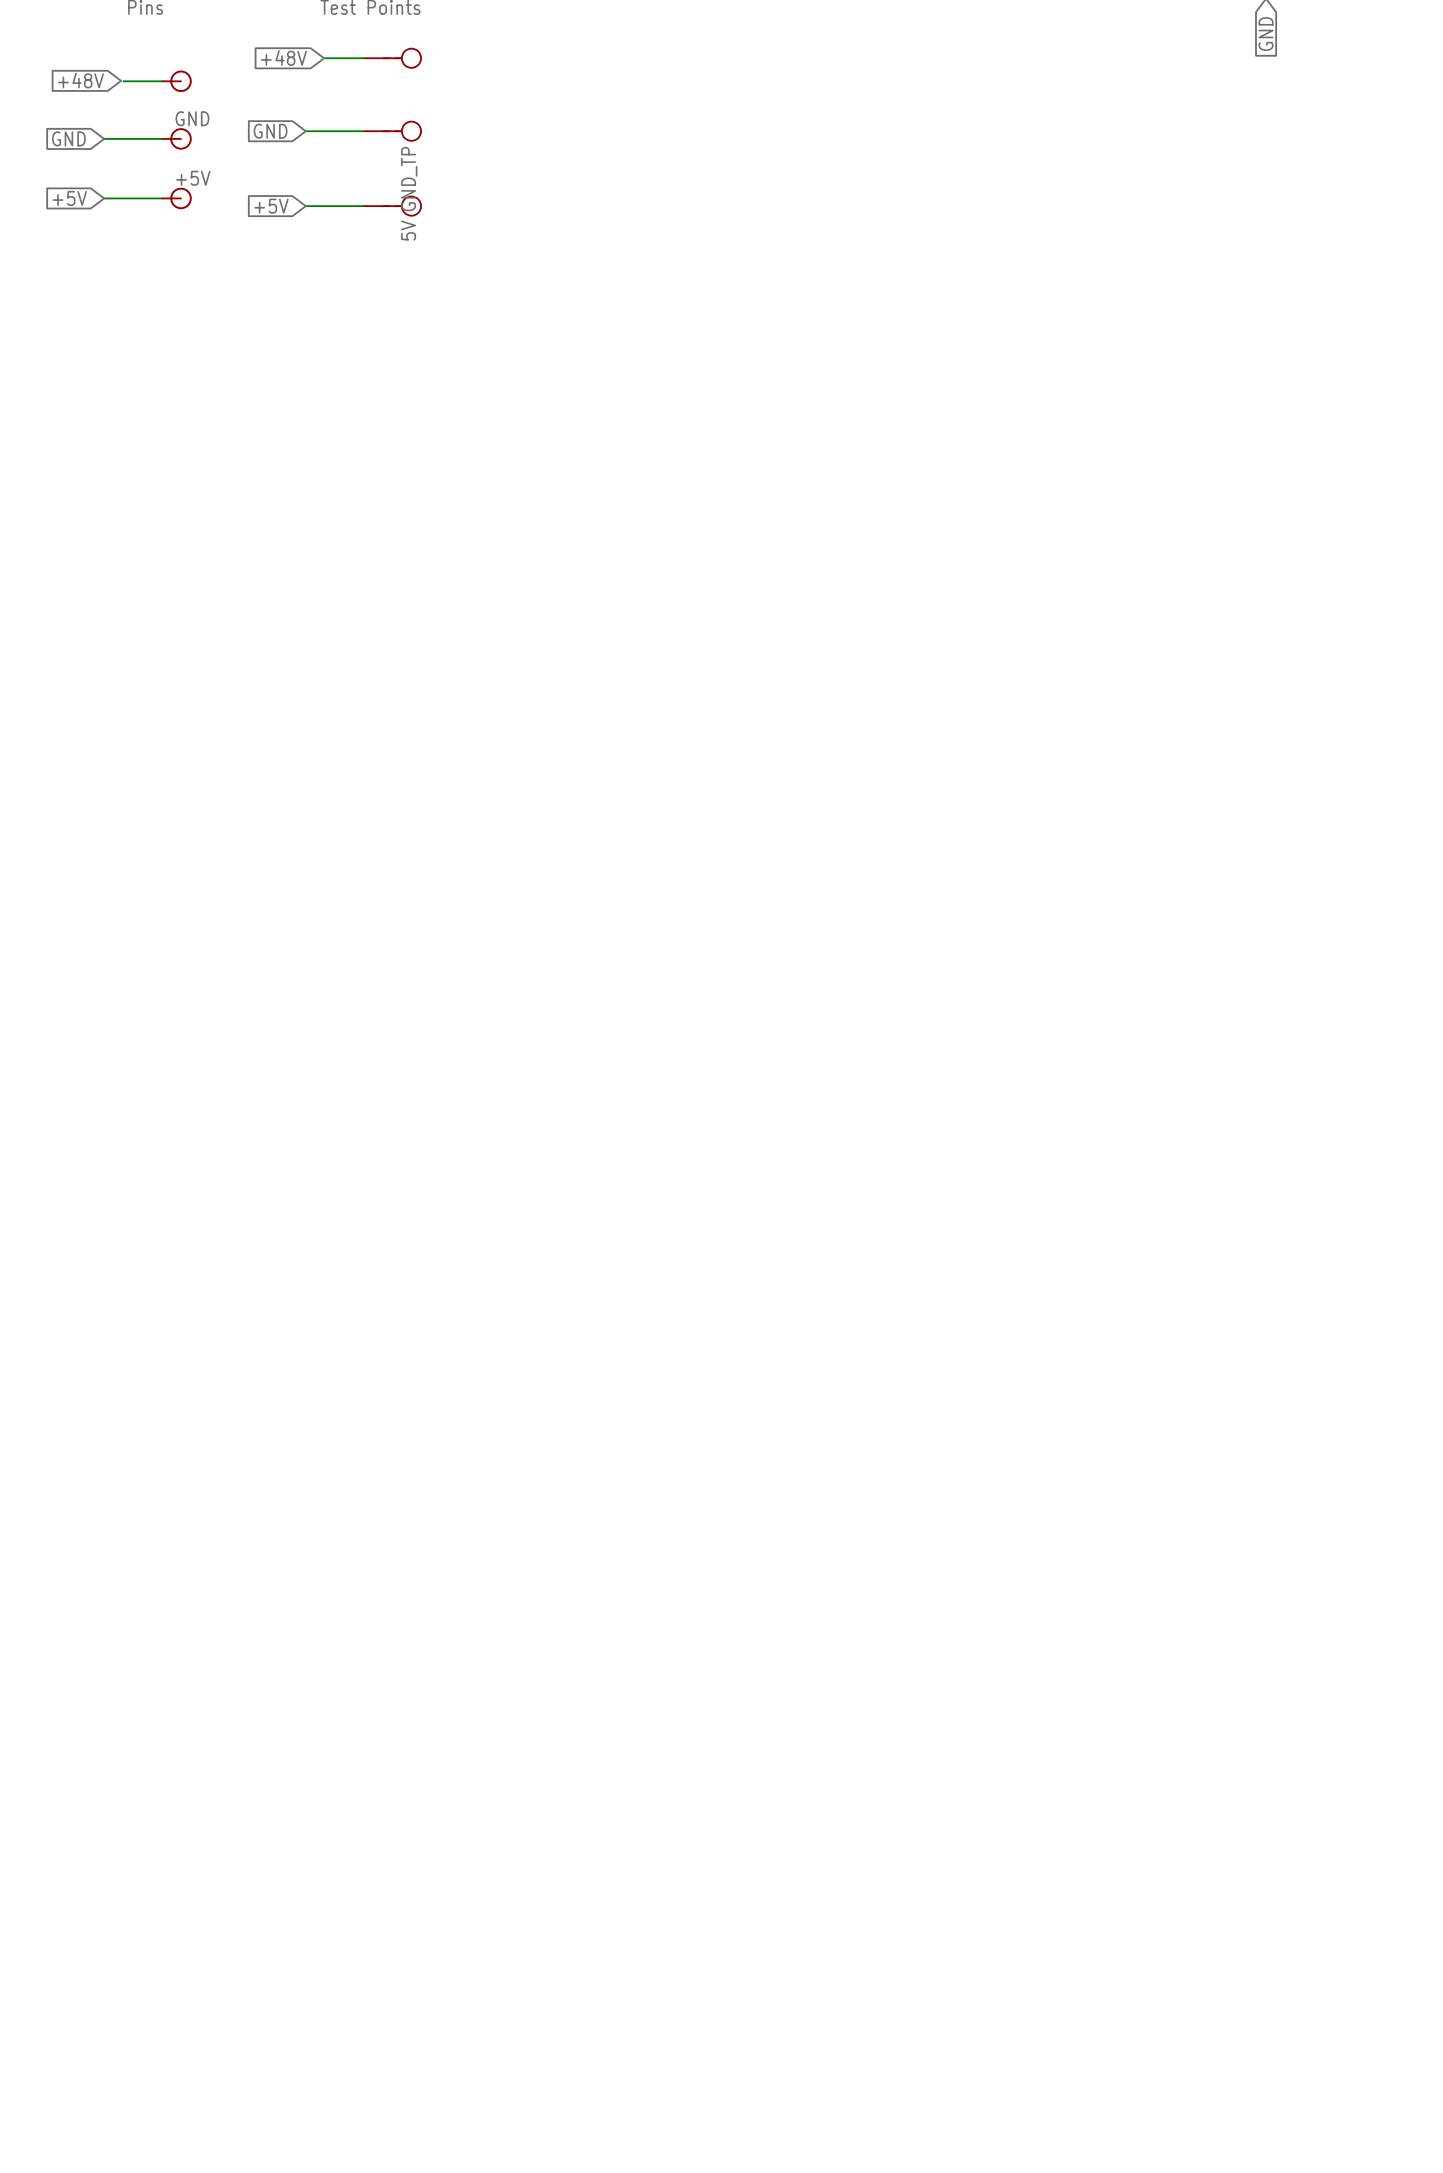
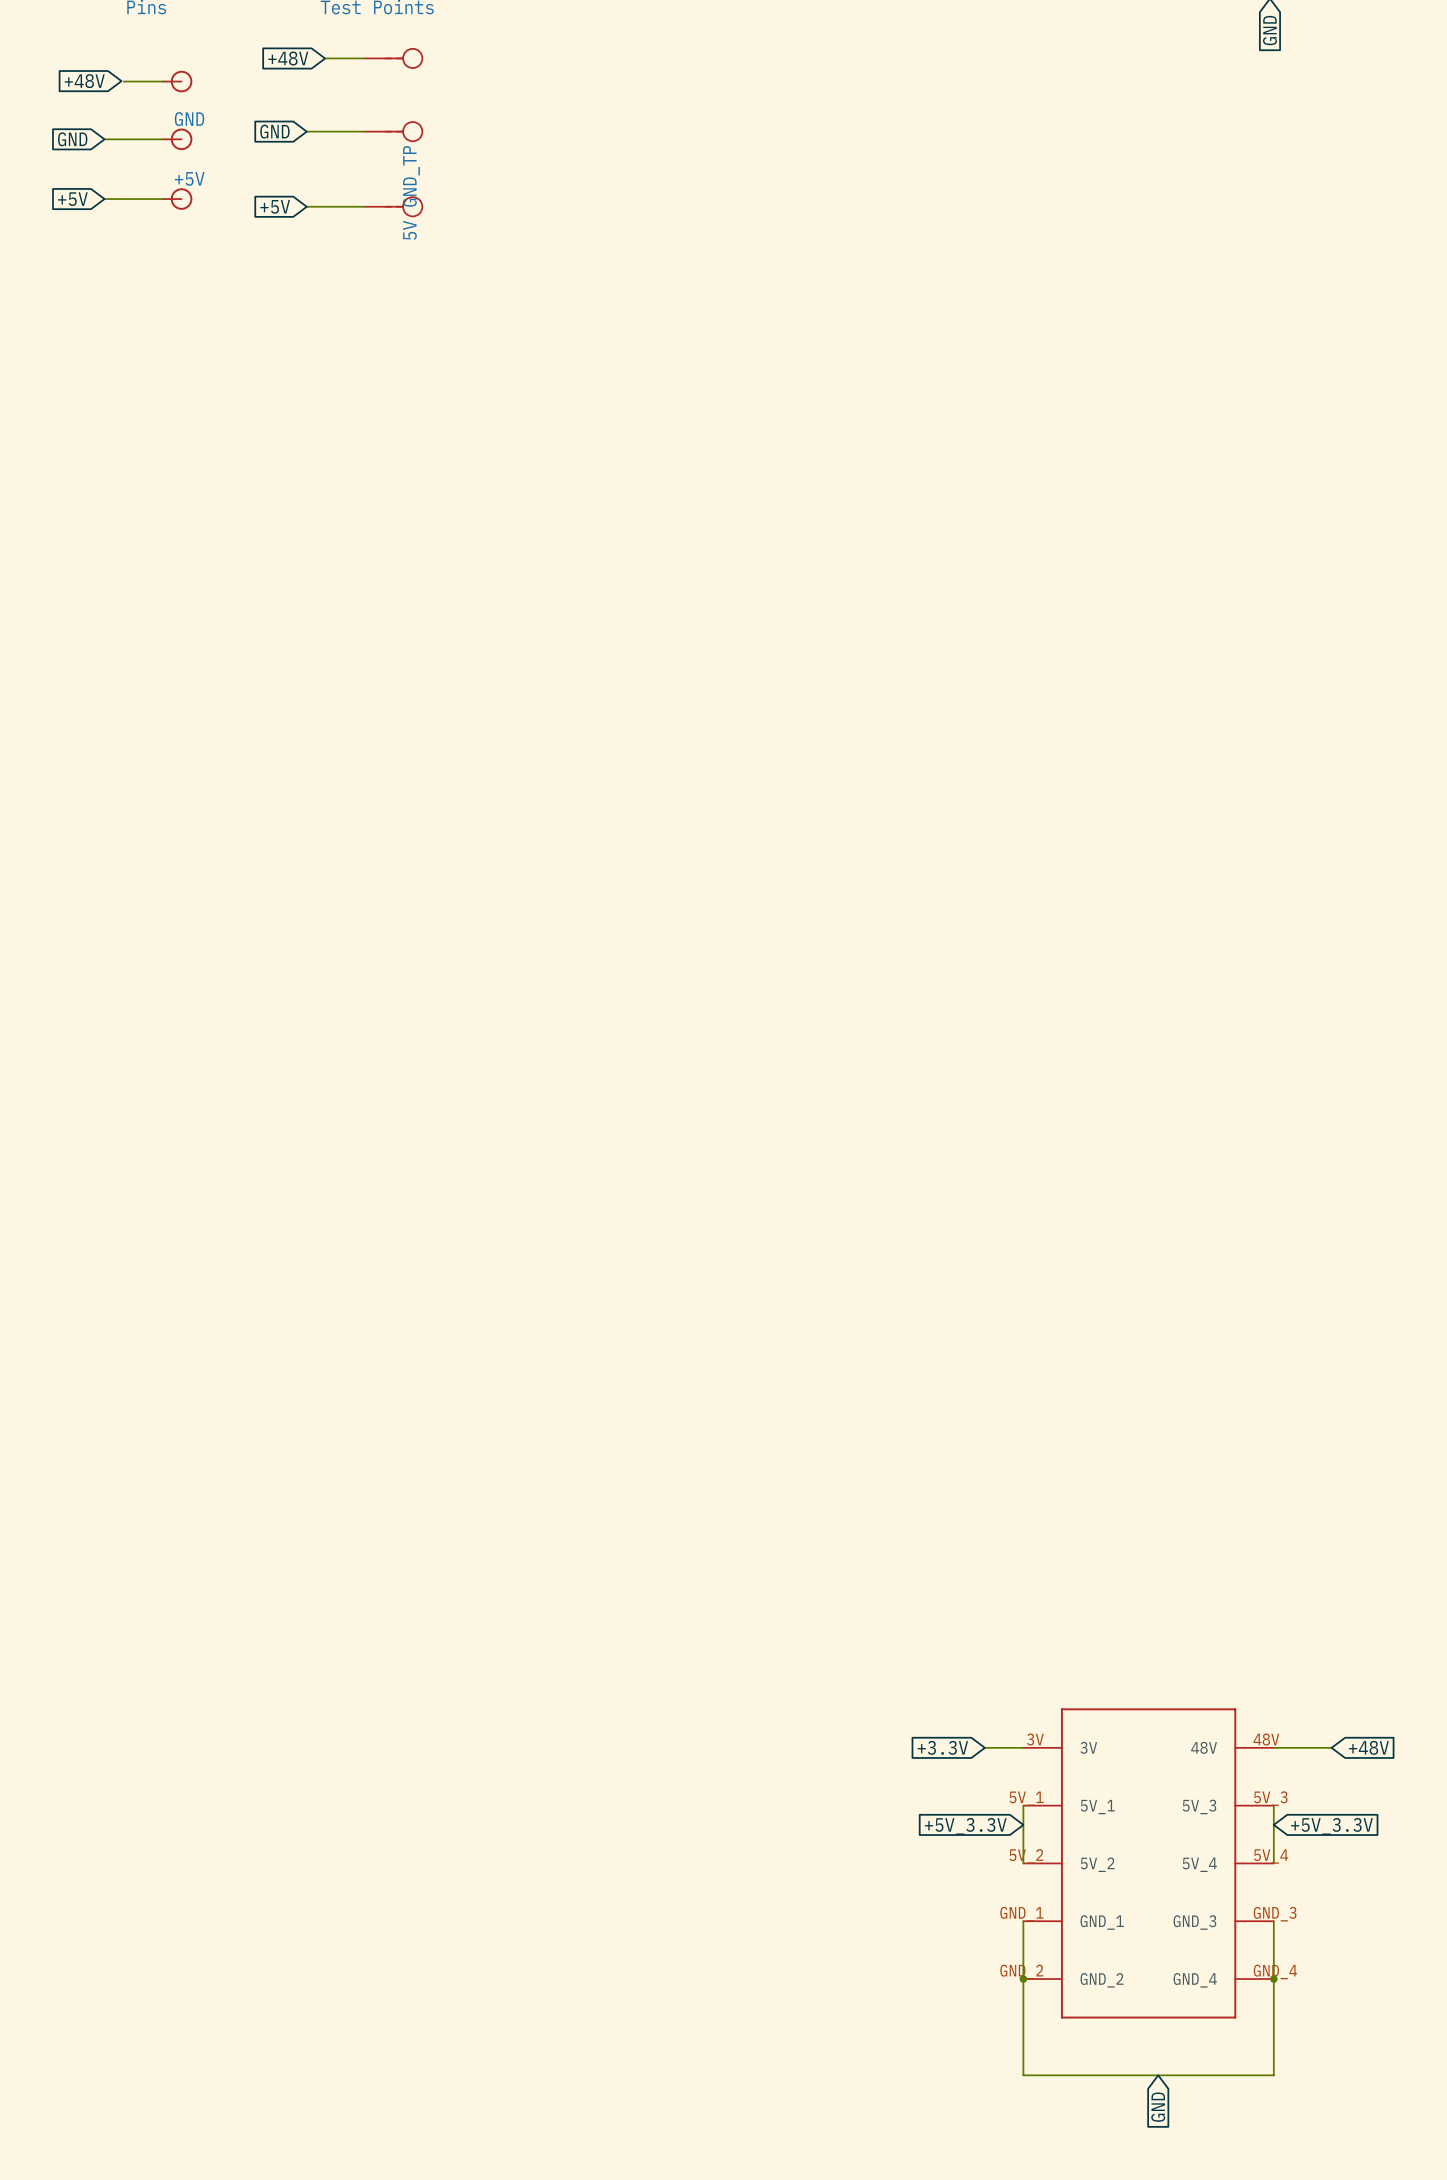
global label: none -> +3.3V (942, 1747)
wire: none -> (984, 1747) (1023, 1747)
wire: none -> (1273, 1747) (1331, 1747)
global label: none -> +48V (1368, 1747)
wire: none -> (1023, 1805) (1023, 1863)
wire: none -> (1273, 1805) (1273, 1863)
global label: none -> +5V_3.3V (965, 1826)
global label: none -> +5V_3.3V (1331, 1826)
part: none -> (1148, 1863)
wire: none -> (1023, 1921) (1023, 2075) (1273, 2075) (1273, 1921)
junction: none -> (1023, 1979)
junction: none -> (1273, 1979)
global label: none -> GND (1158, 2107)

